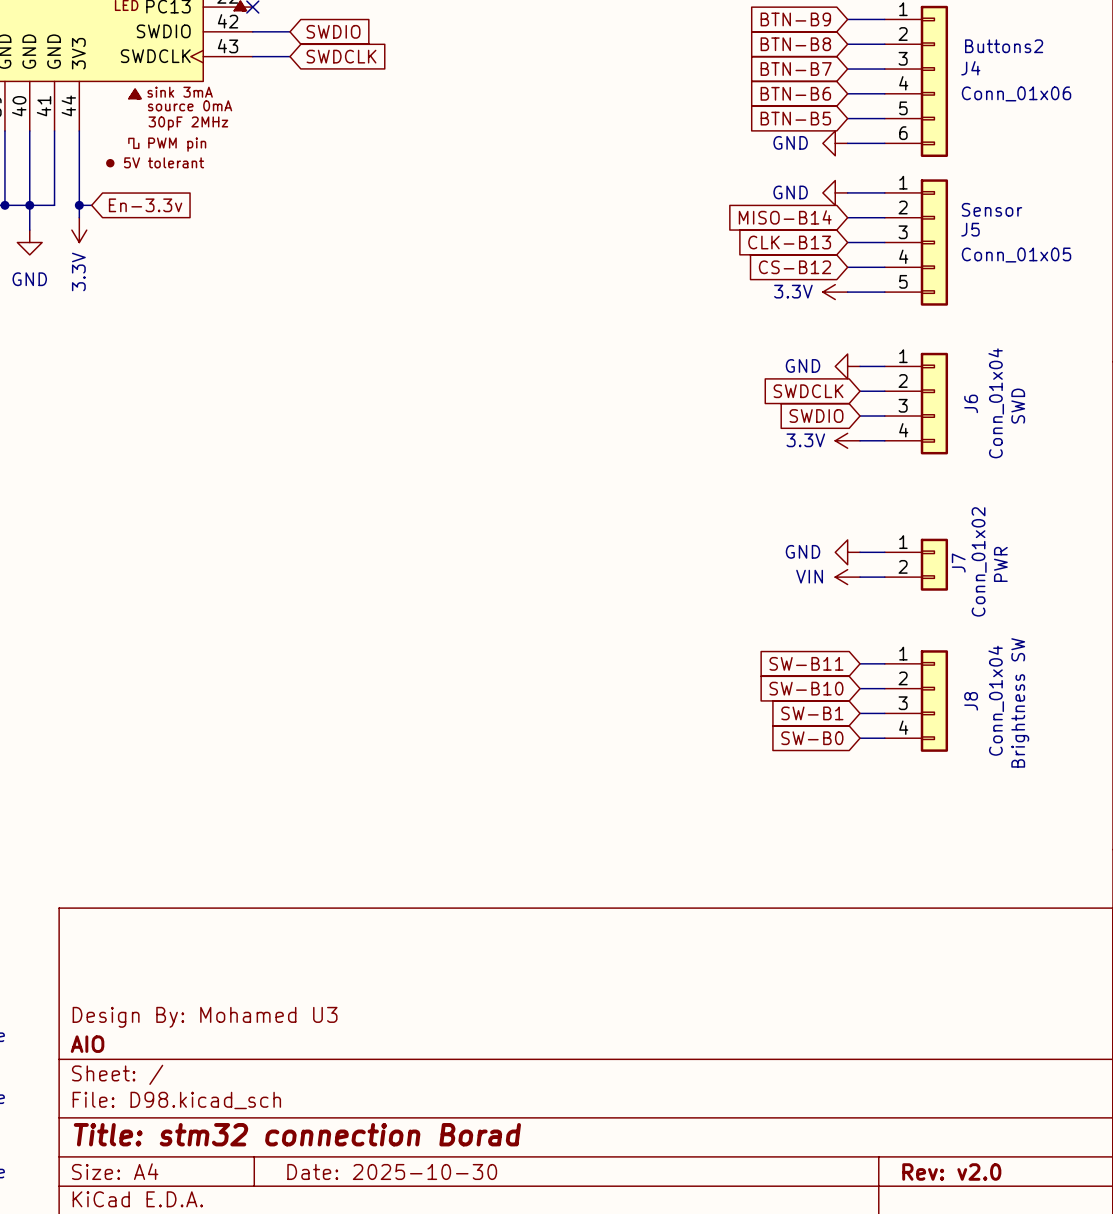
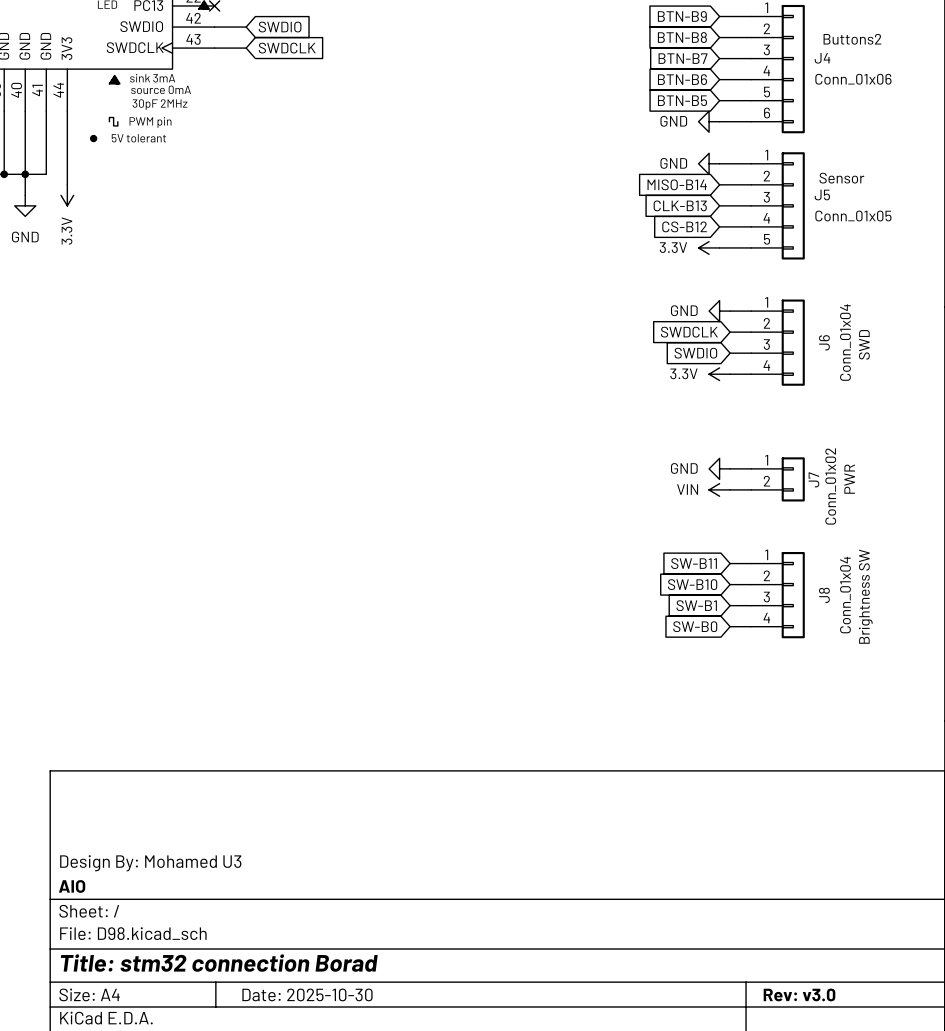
wire: (79, 205) (91, 205) -> none
junction: (79, 205) -> none
global label: En-3.3v (145, 205) -> none
title block: Rev: v2.0 (951, 1171) -> Rev: v3.0 (799, 994)

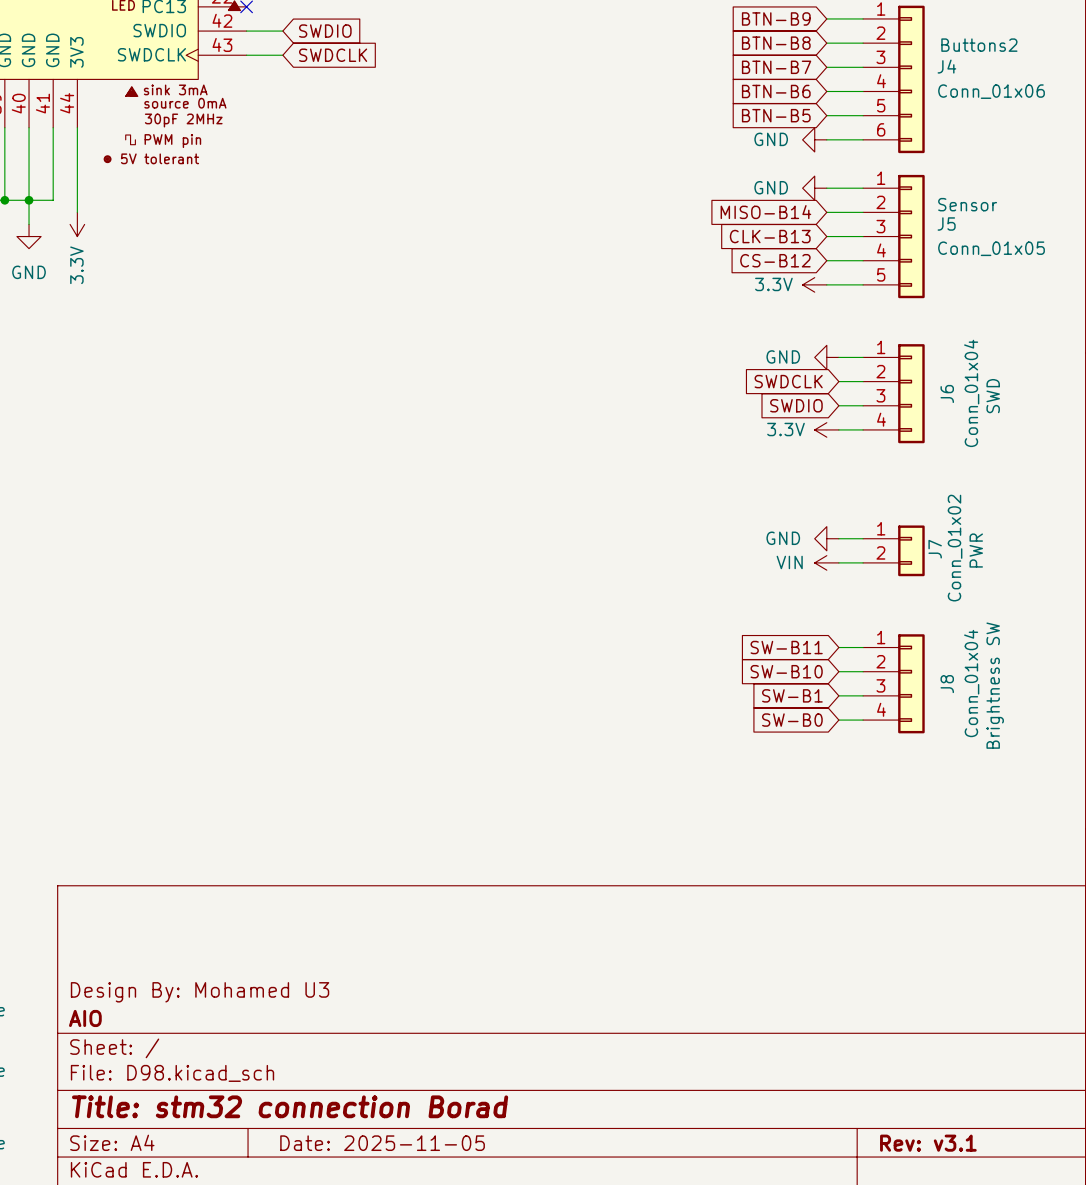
title block: Date: 2025-10-30 (307, 994) -> Date: 2025-11-05 (382, 1143)
title block: Rev: v3.0 (799, 994) -> Rev: v3.1 (928, 1143)

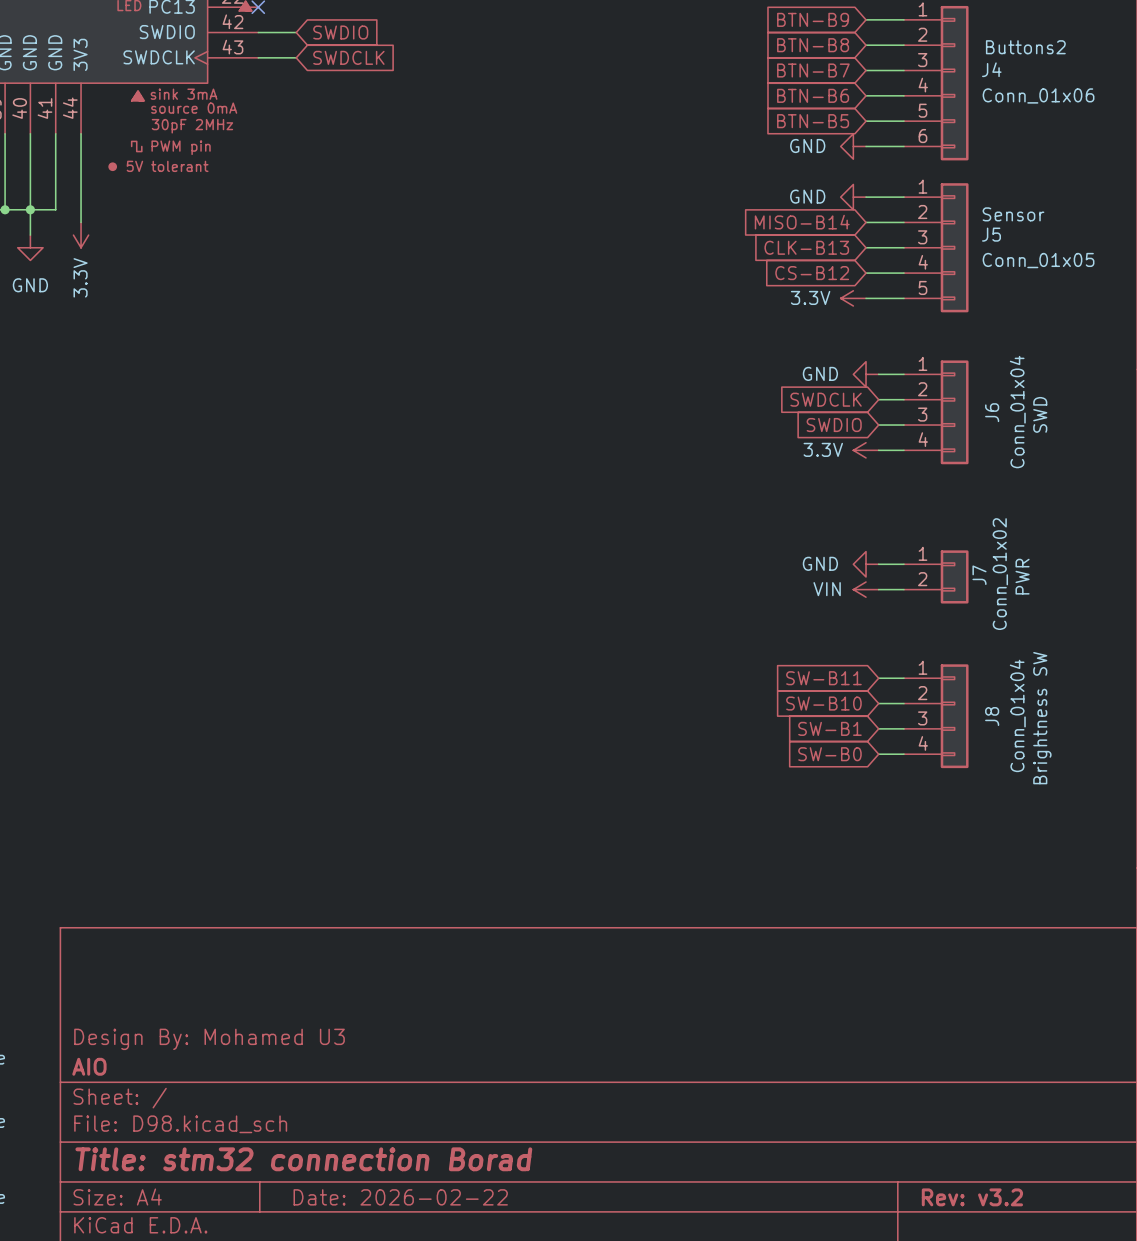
title block: Date: 2025-11-05 (382, 1143) -> Date: 2026-02-22 (400, 1197)
title block: Rev: v3.1 (928, 1143) -> Rev: v3.2 (972, 1197)

